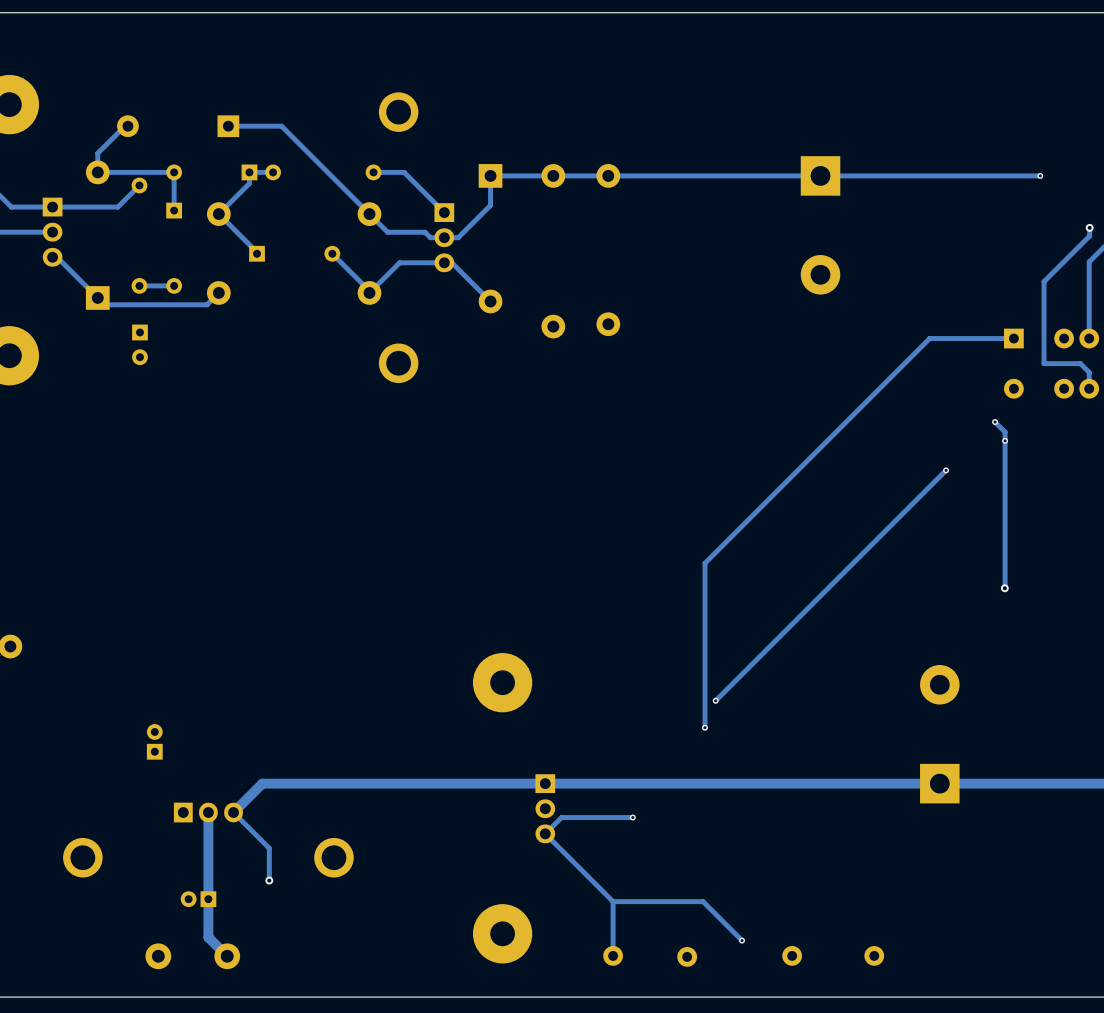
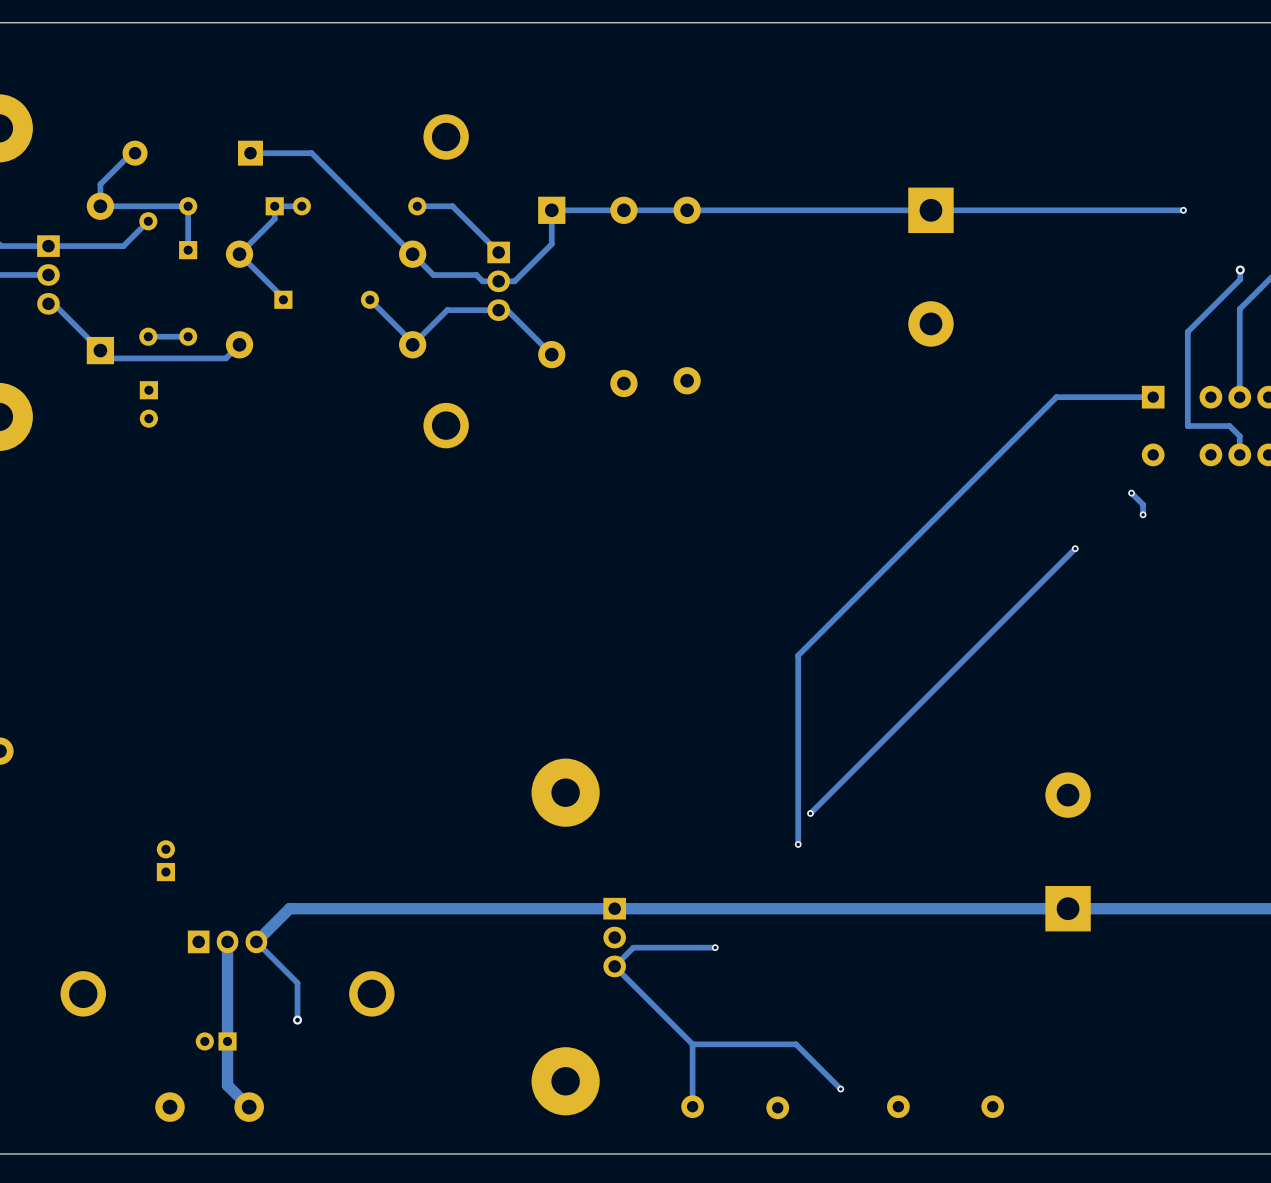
track: (1005, 440) (1004, 588) -> none
via: (1004, 588) -> none

